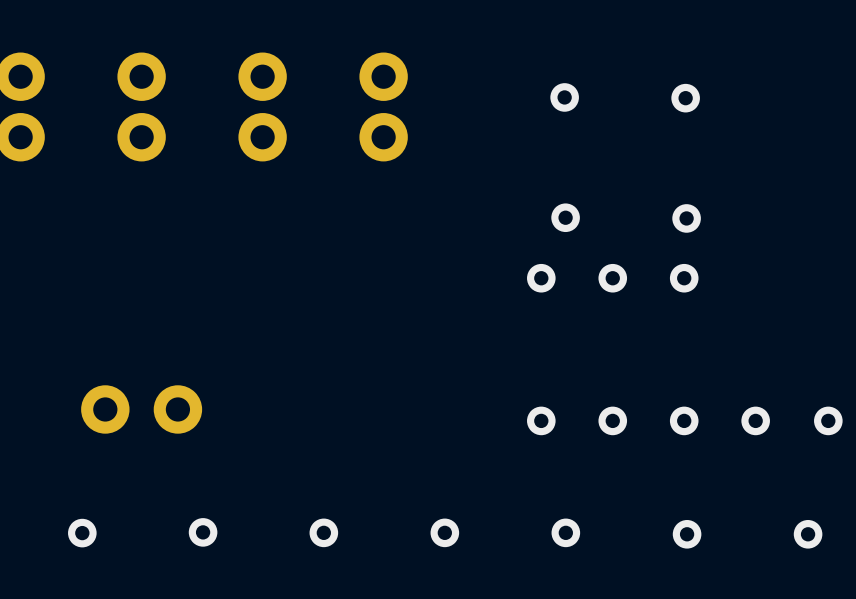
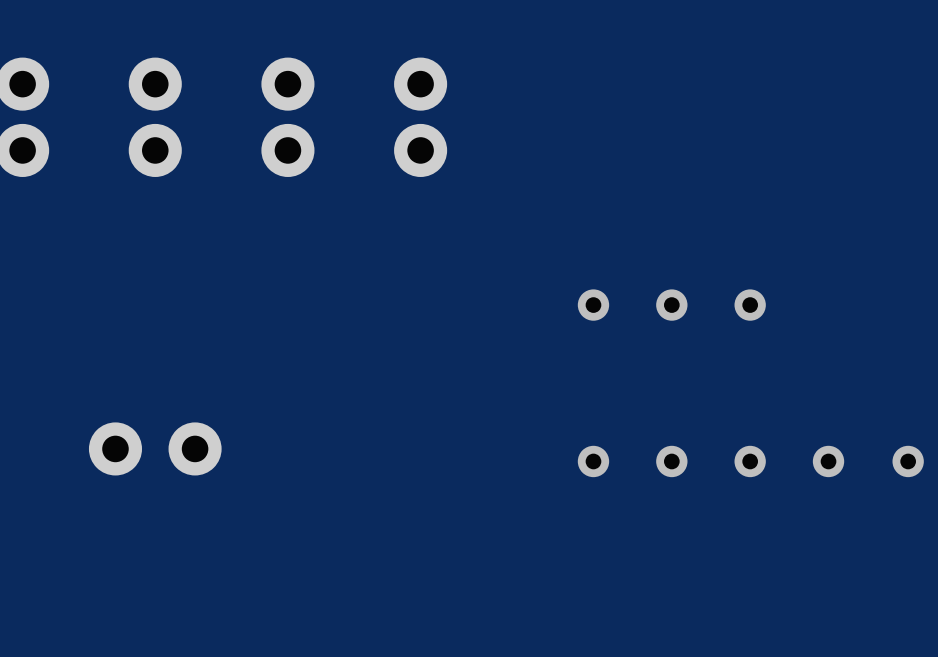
via: (564, 97) -> none
via: (685, 98) -> none
via: (565, 217) -> none
via: (686, 218) -> none
via: (203, 532) -> none
via: (323, 532) -> none
via: (444, 532) -> none
via: (565, 532) -> none
via: (82, 533) -> none
via: (687, 534) -> none
via: (808, 534) -> none

